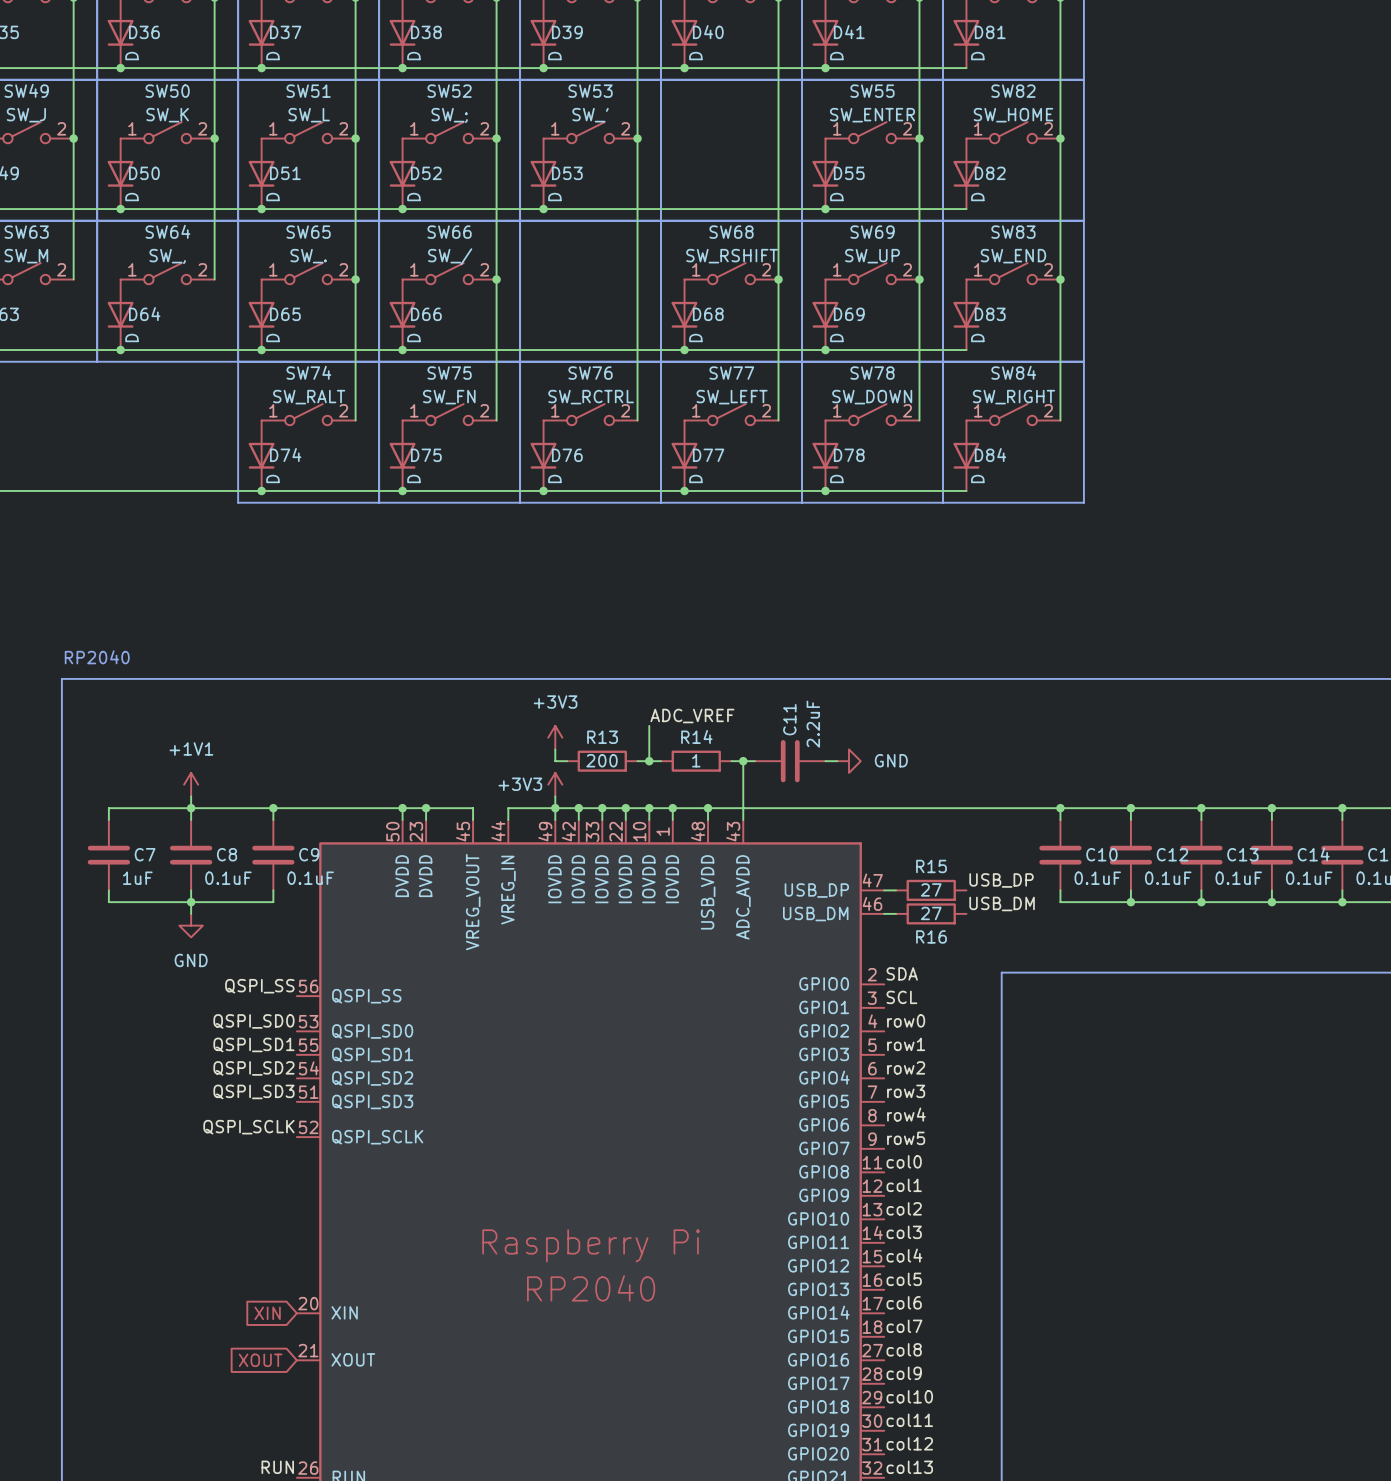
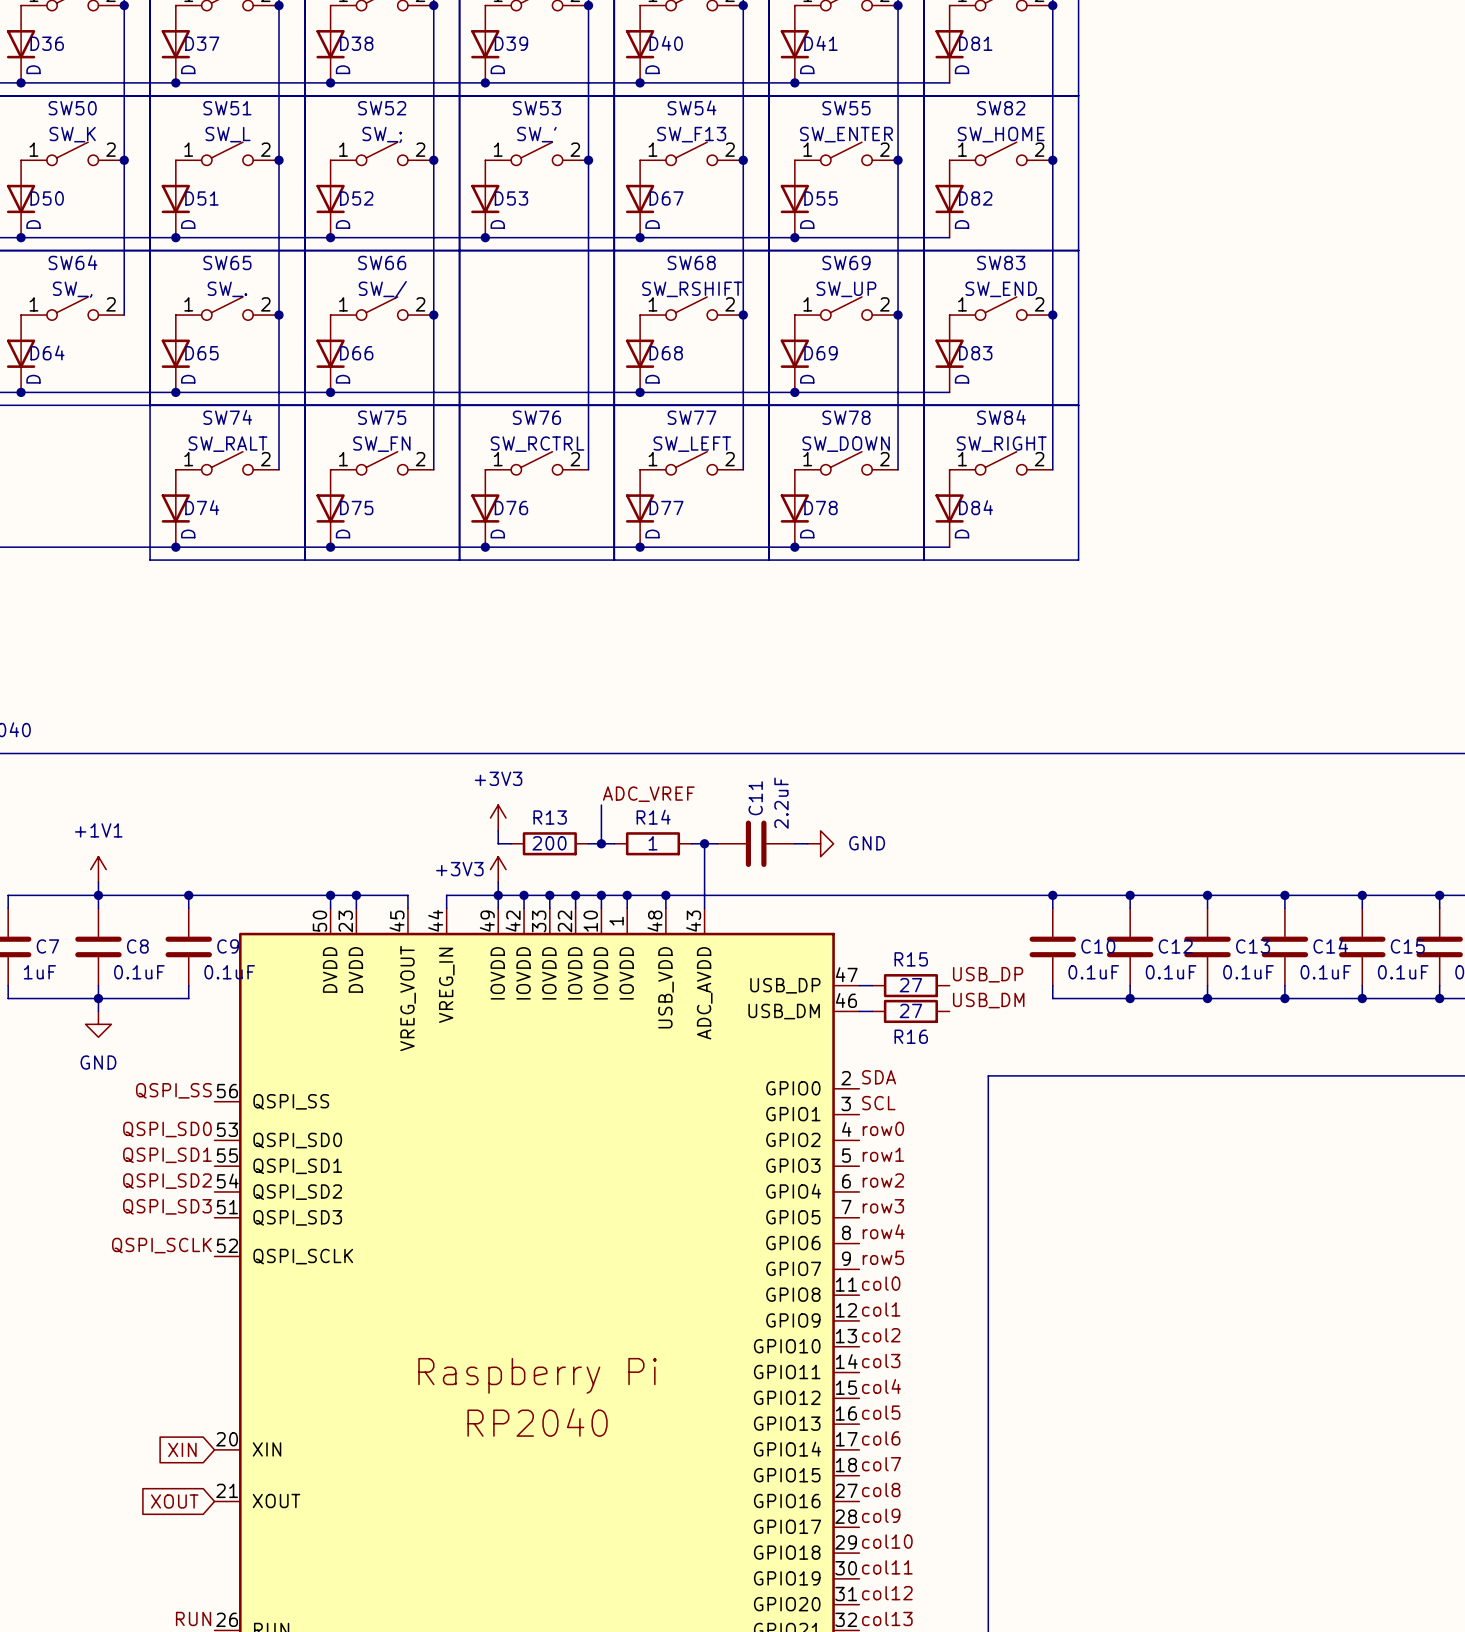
SW54: none -> SW_F13 (691, 153)
junction: none -> (743, 160)
D67: none -> D (640, 198)
junction: none -> (640, 237)

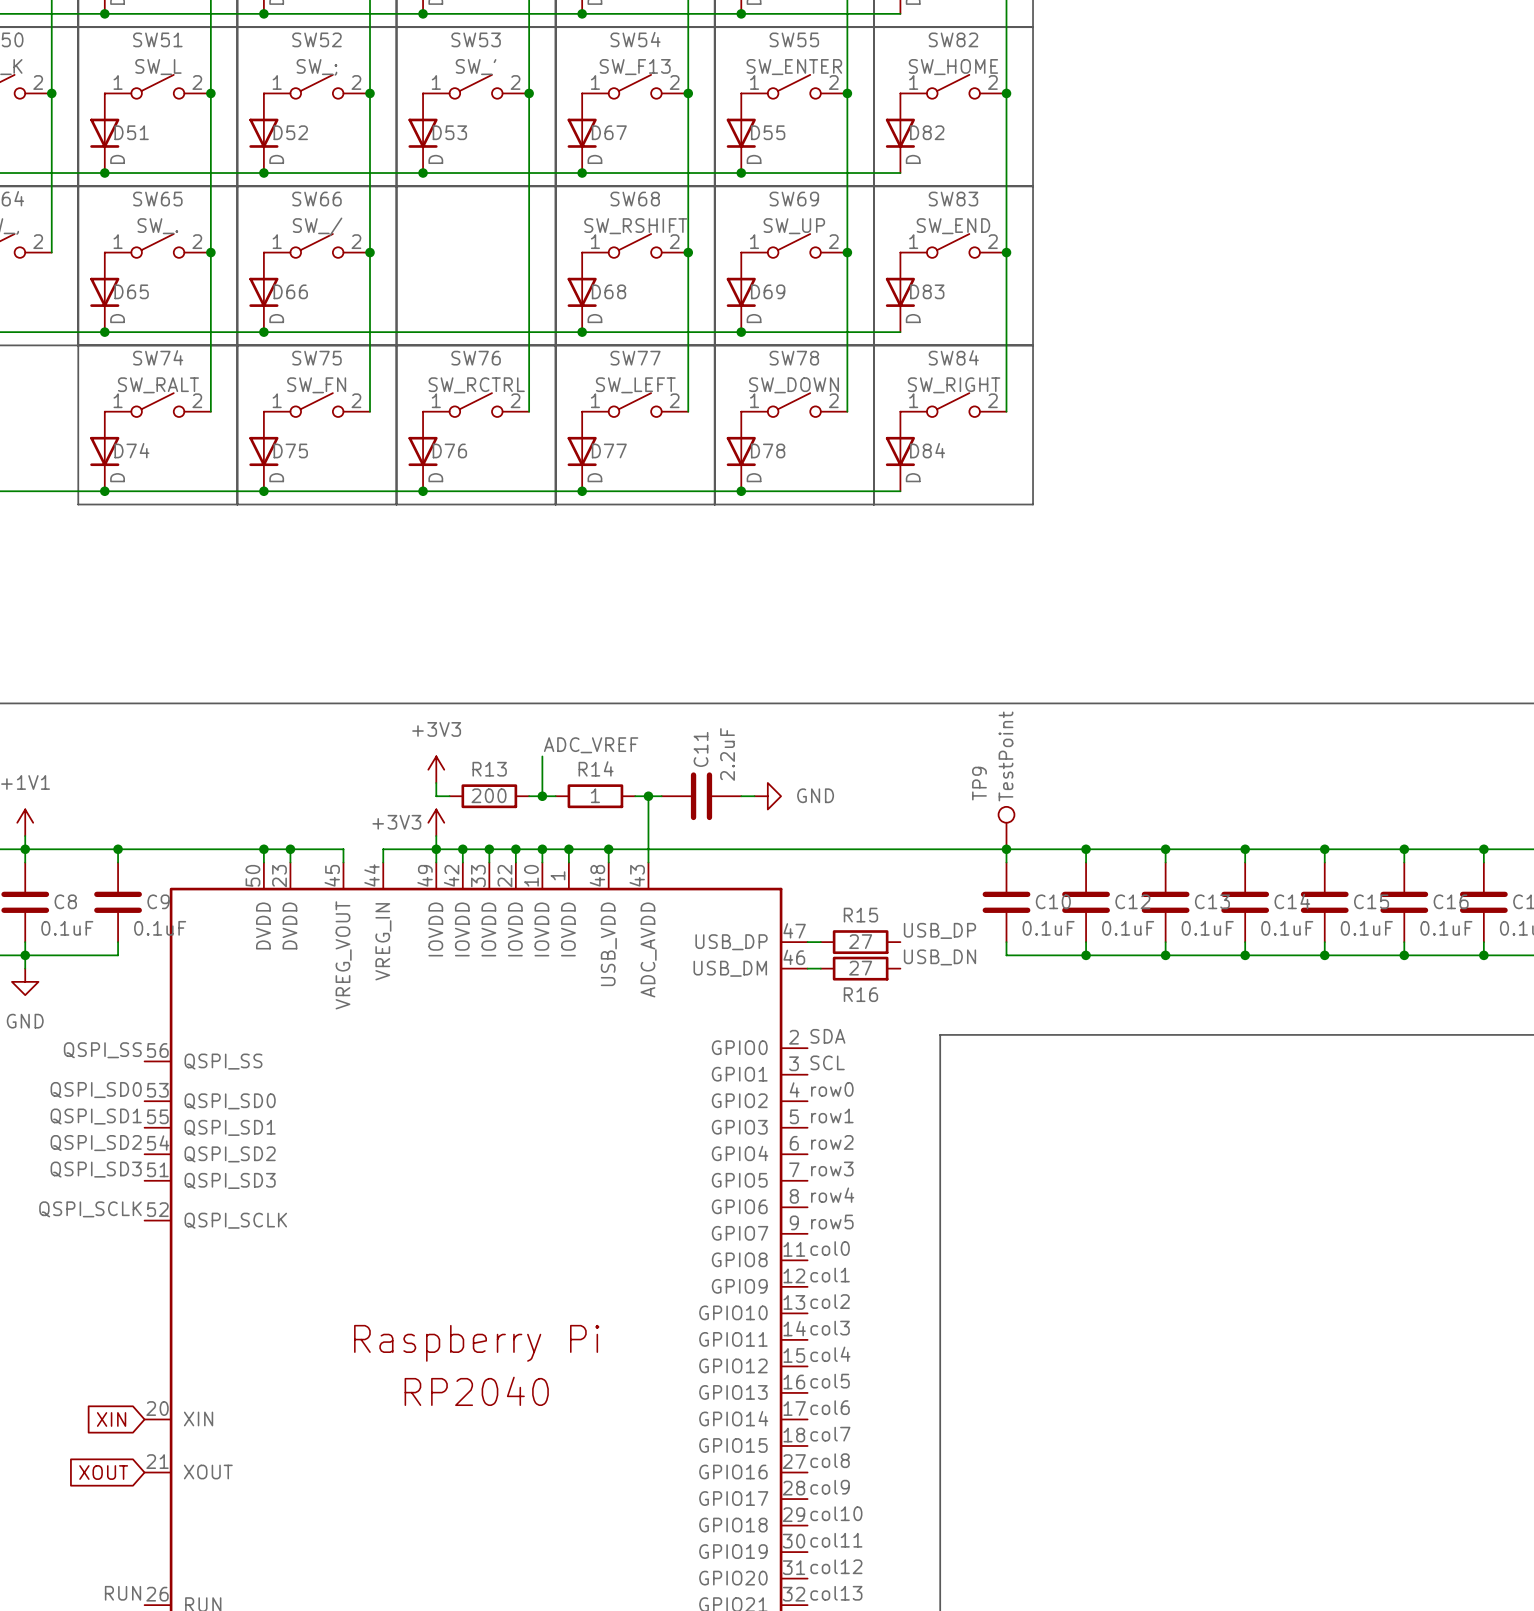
TP9: none -> TestPoint (1006, 828)
label: USB_DM (988, 1000) -> USB_DN (939, 957)

